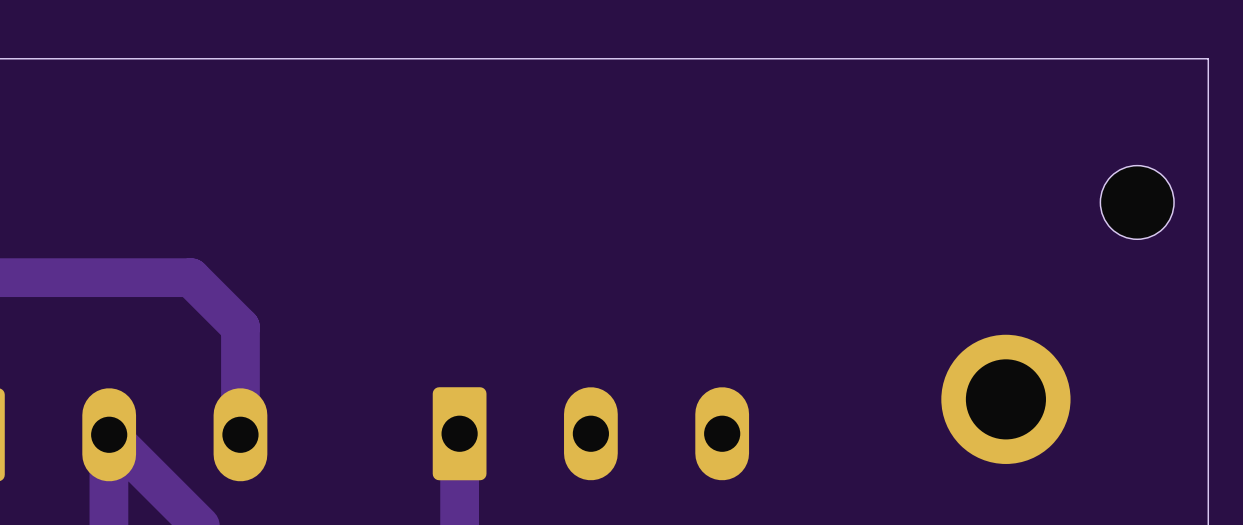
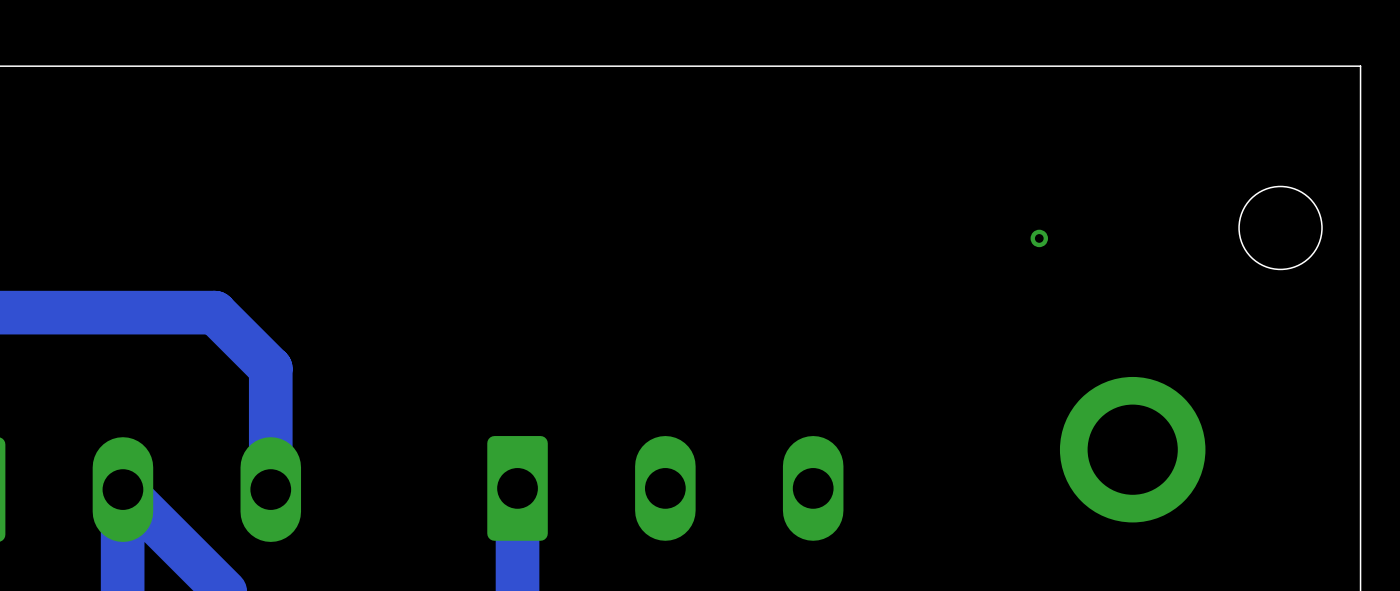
via: none -> (1039, 238)

